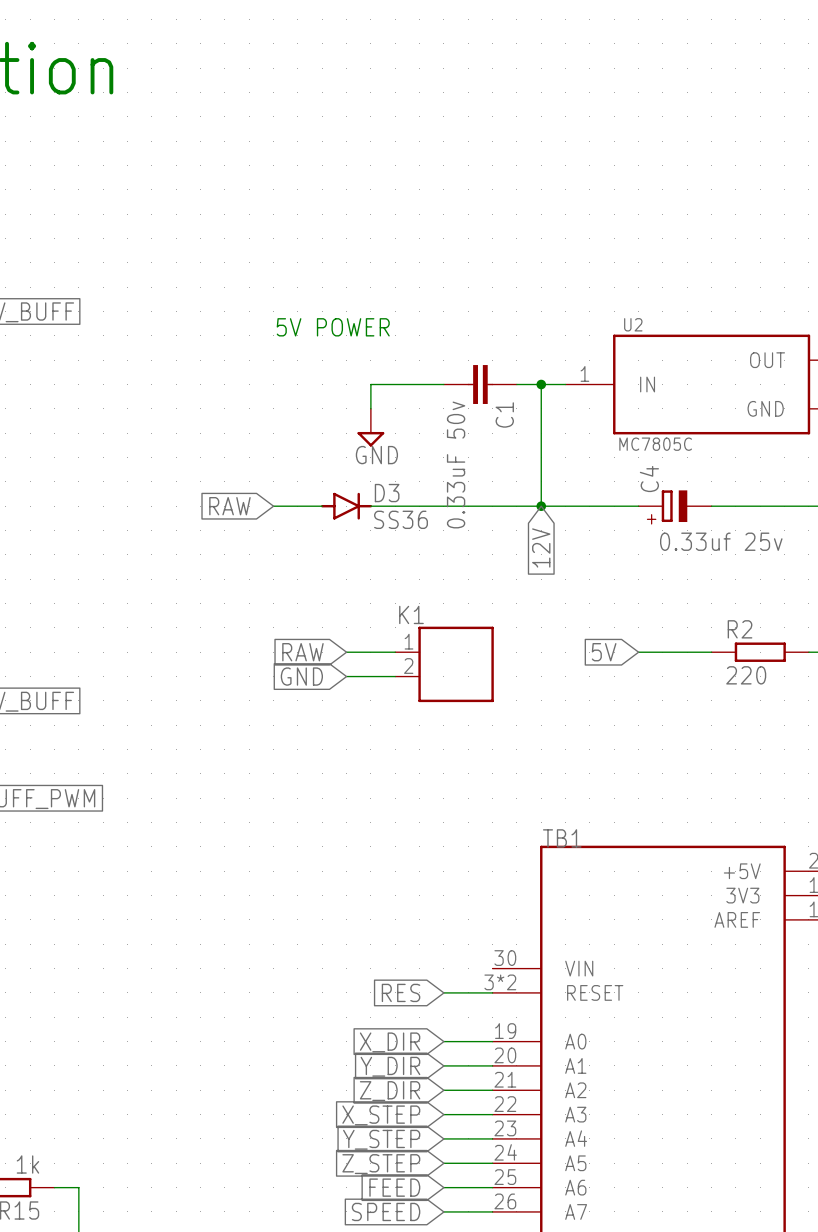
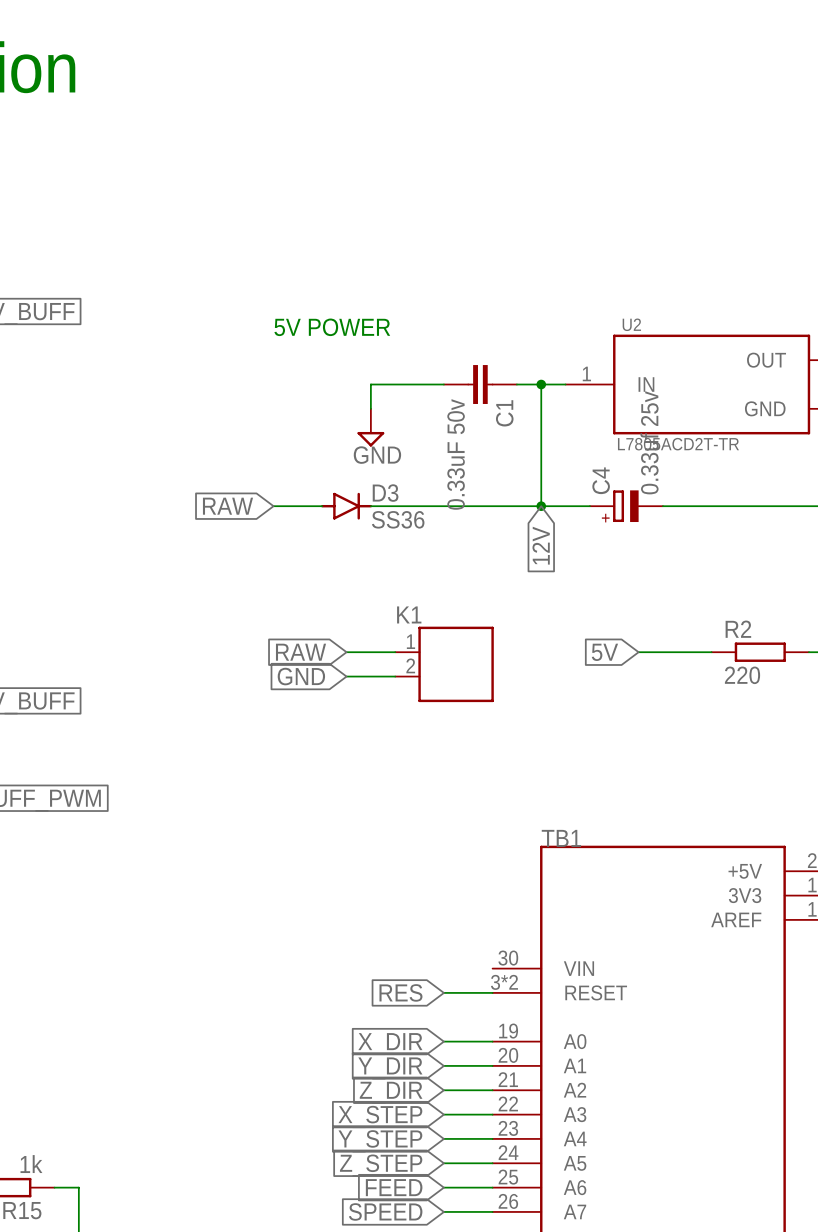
U2 value: MC7805C (655, 444) -> L7805ACD2T-TR (678, 444)
C4 position: (675, 506) -> (626, 506)
C4 value rotation: 0° (721, 541) -> 90° counterclockwise (649, 442)

